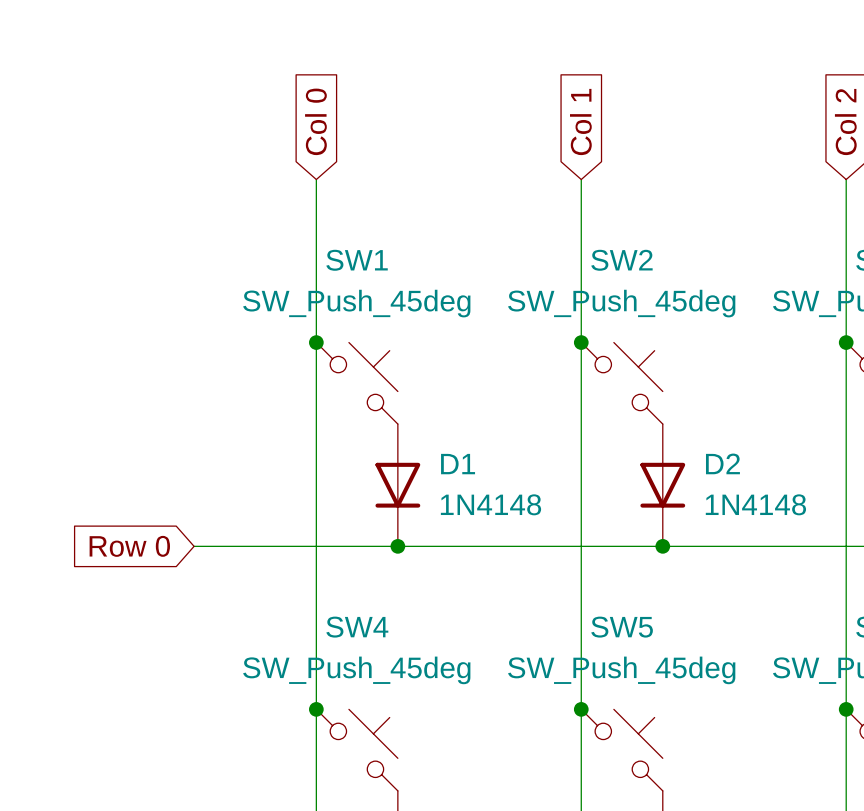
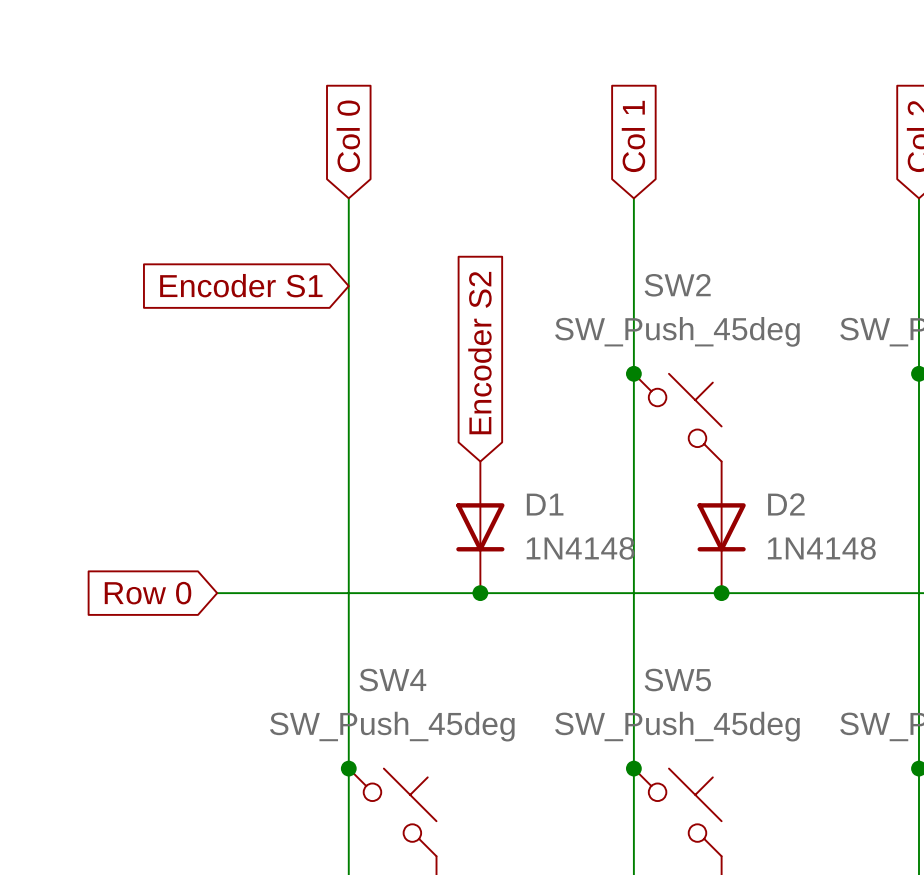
global label: none -> Encoder S1 (241, 285)
global label: none -> Encoder S2 (479, 353)
junction: (316, 342) -> none
SW1: SW_Push_45deg (357, 383) -> none
D1 position: (397, 485) -> (480, 527)
junction position: (397, 546) -> (480, 593)

